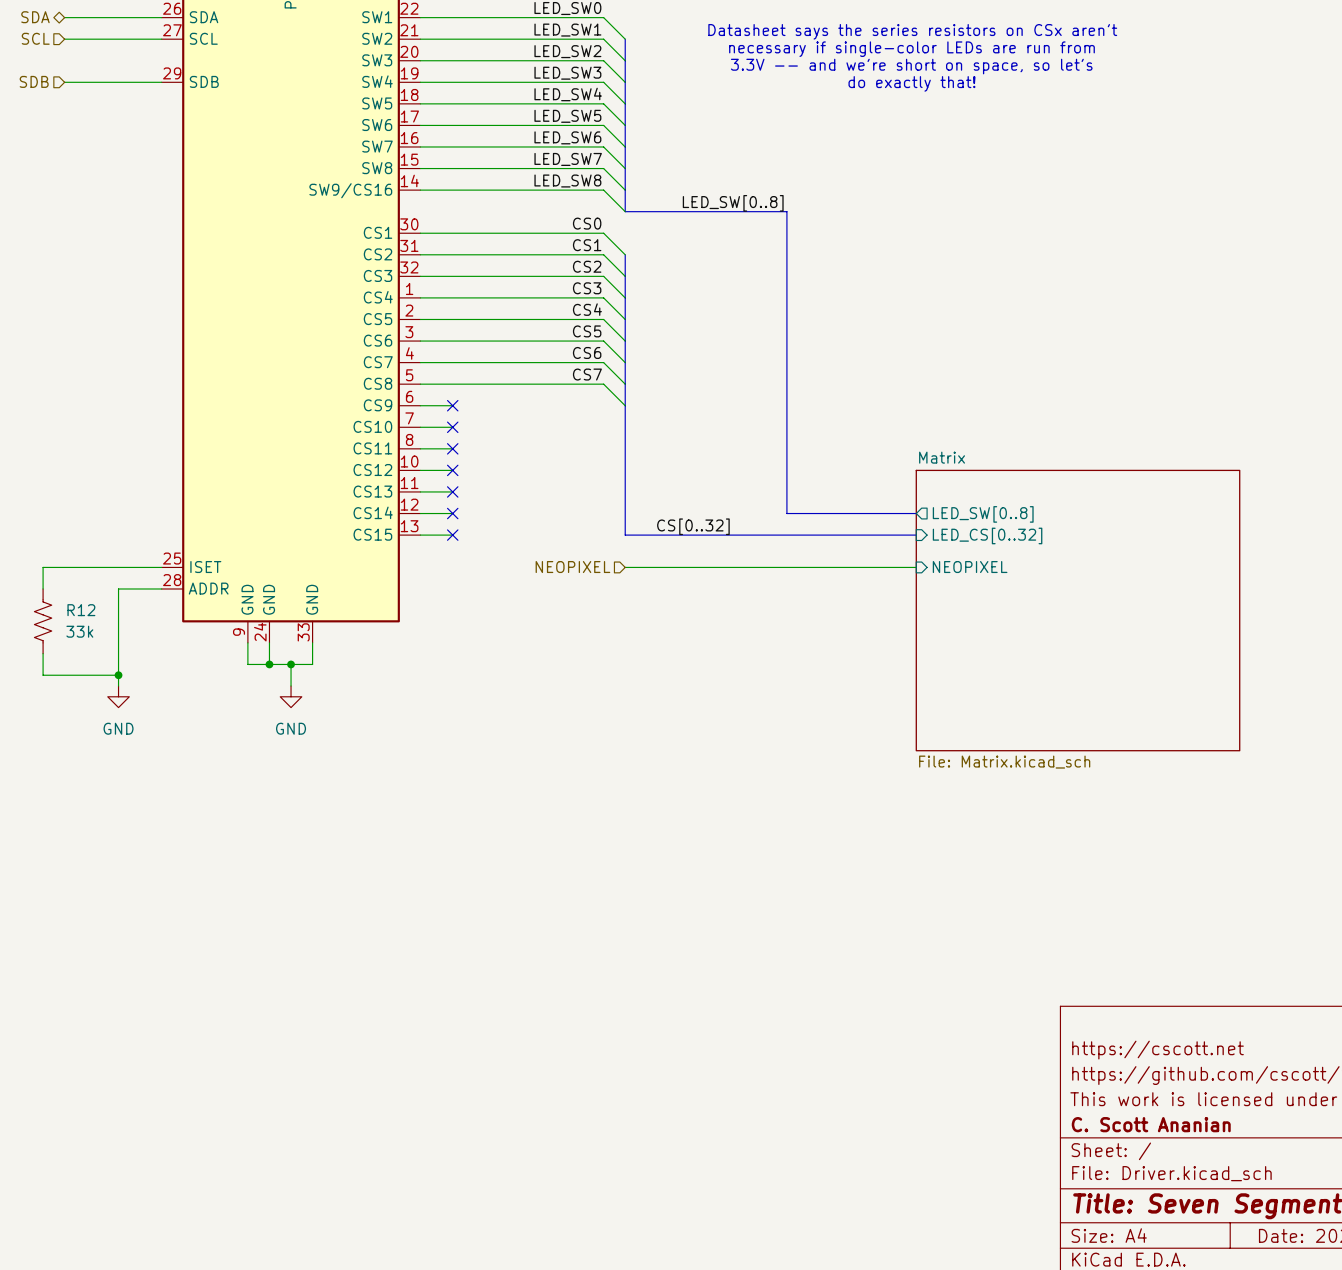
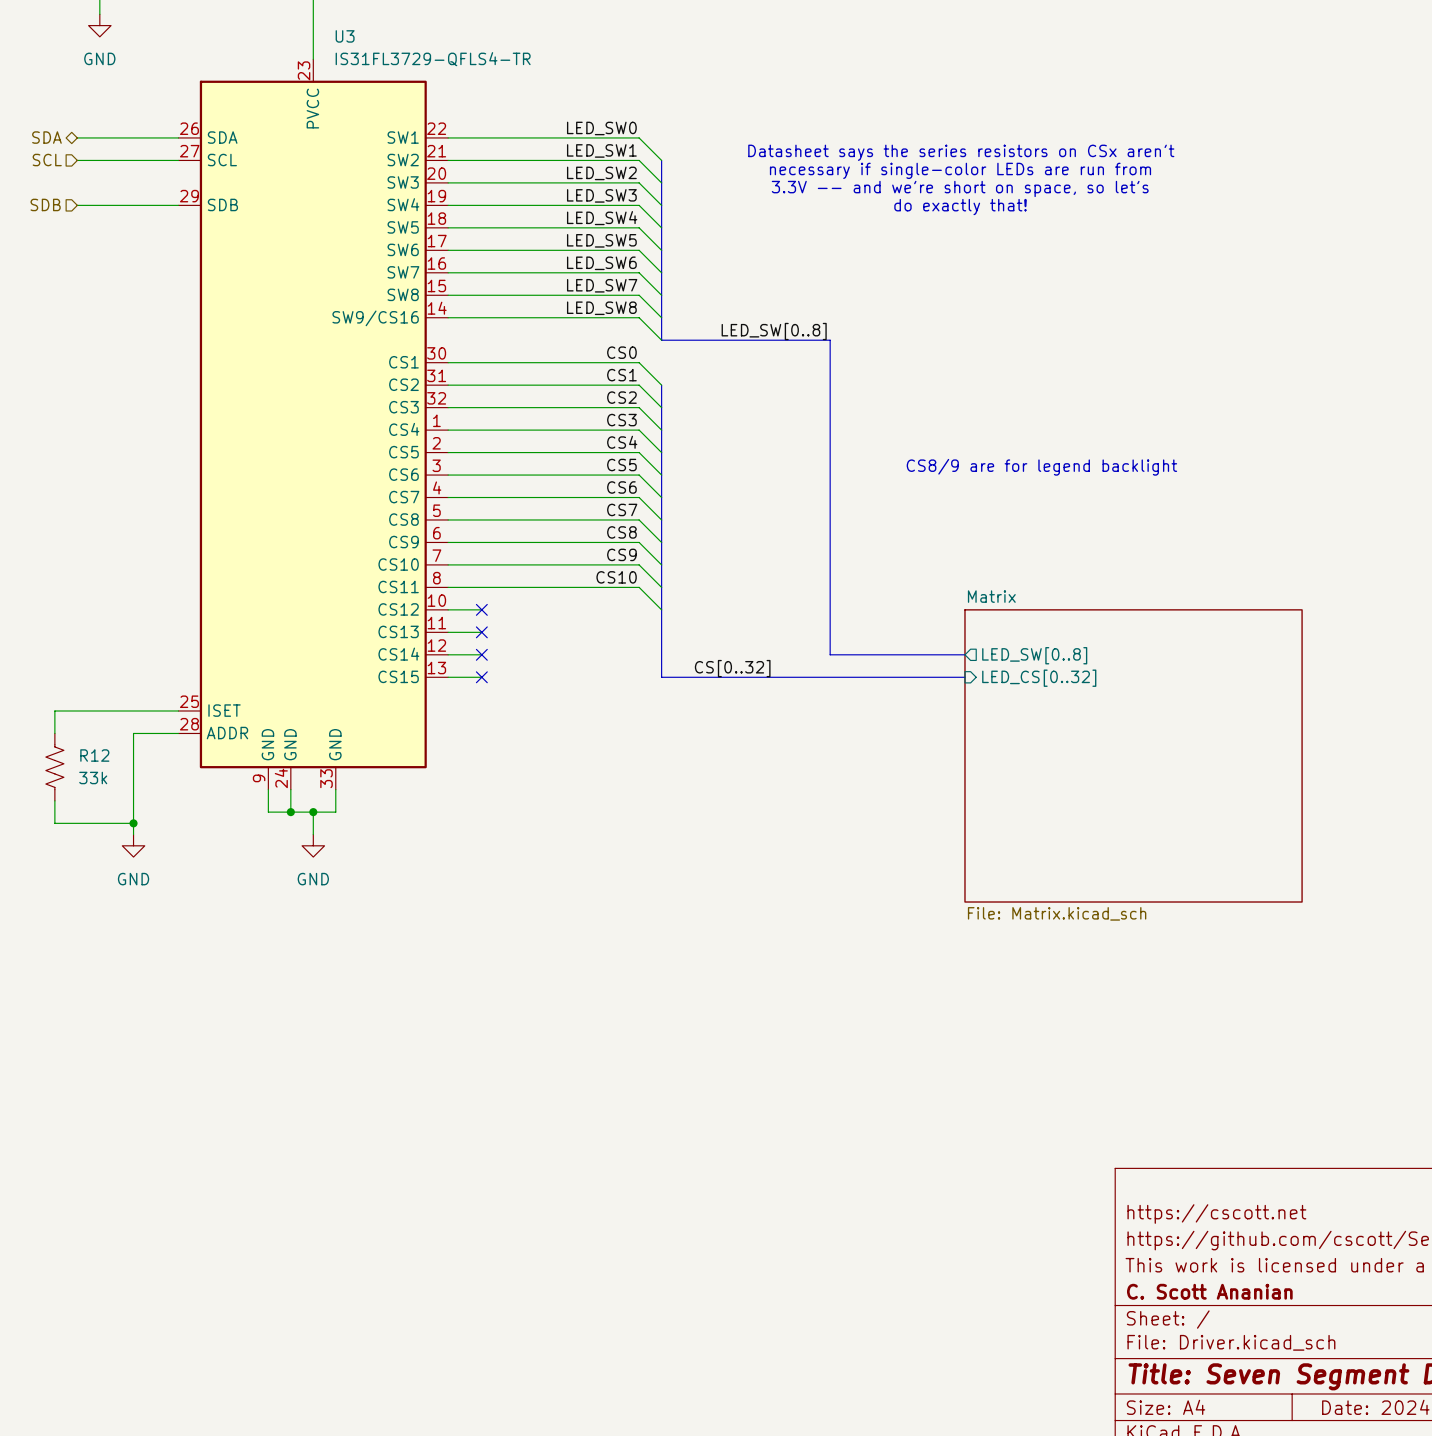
text: none -> CS8/9 are for legend backlight (1041, 467)
label: none -> CS8 (621, 532)
wire: none -> (481, 542) (639, 542) (661, 564)
no-connect mark: (452, 405) -> none
label: none -> CS9 (621, 554)
wire: none -> (481, 564) (639, 564) (661, 587)
no-connect mark: (452, 427) -> none
label: none -> CS10 (616, 577)
wire: none -> (481, 587) (639, 587) (661, 609)
no-connect mark: (452, 448) -> none
hierarchical label: NEOPIXEL (572, 567) -> none
wire: (625, 567) (916, 567) -> none
sheet pin: NEOPIXEL (970, 567) -> none

